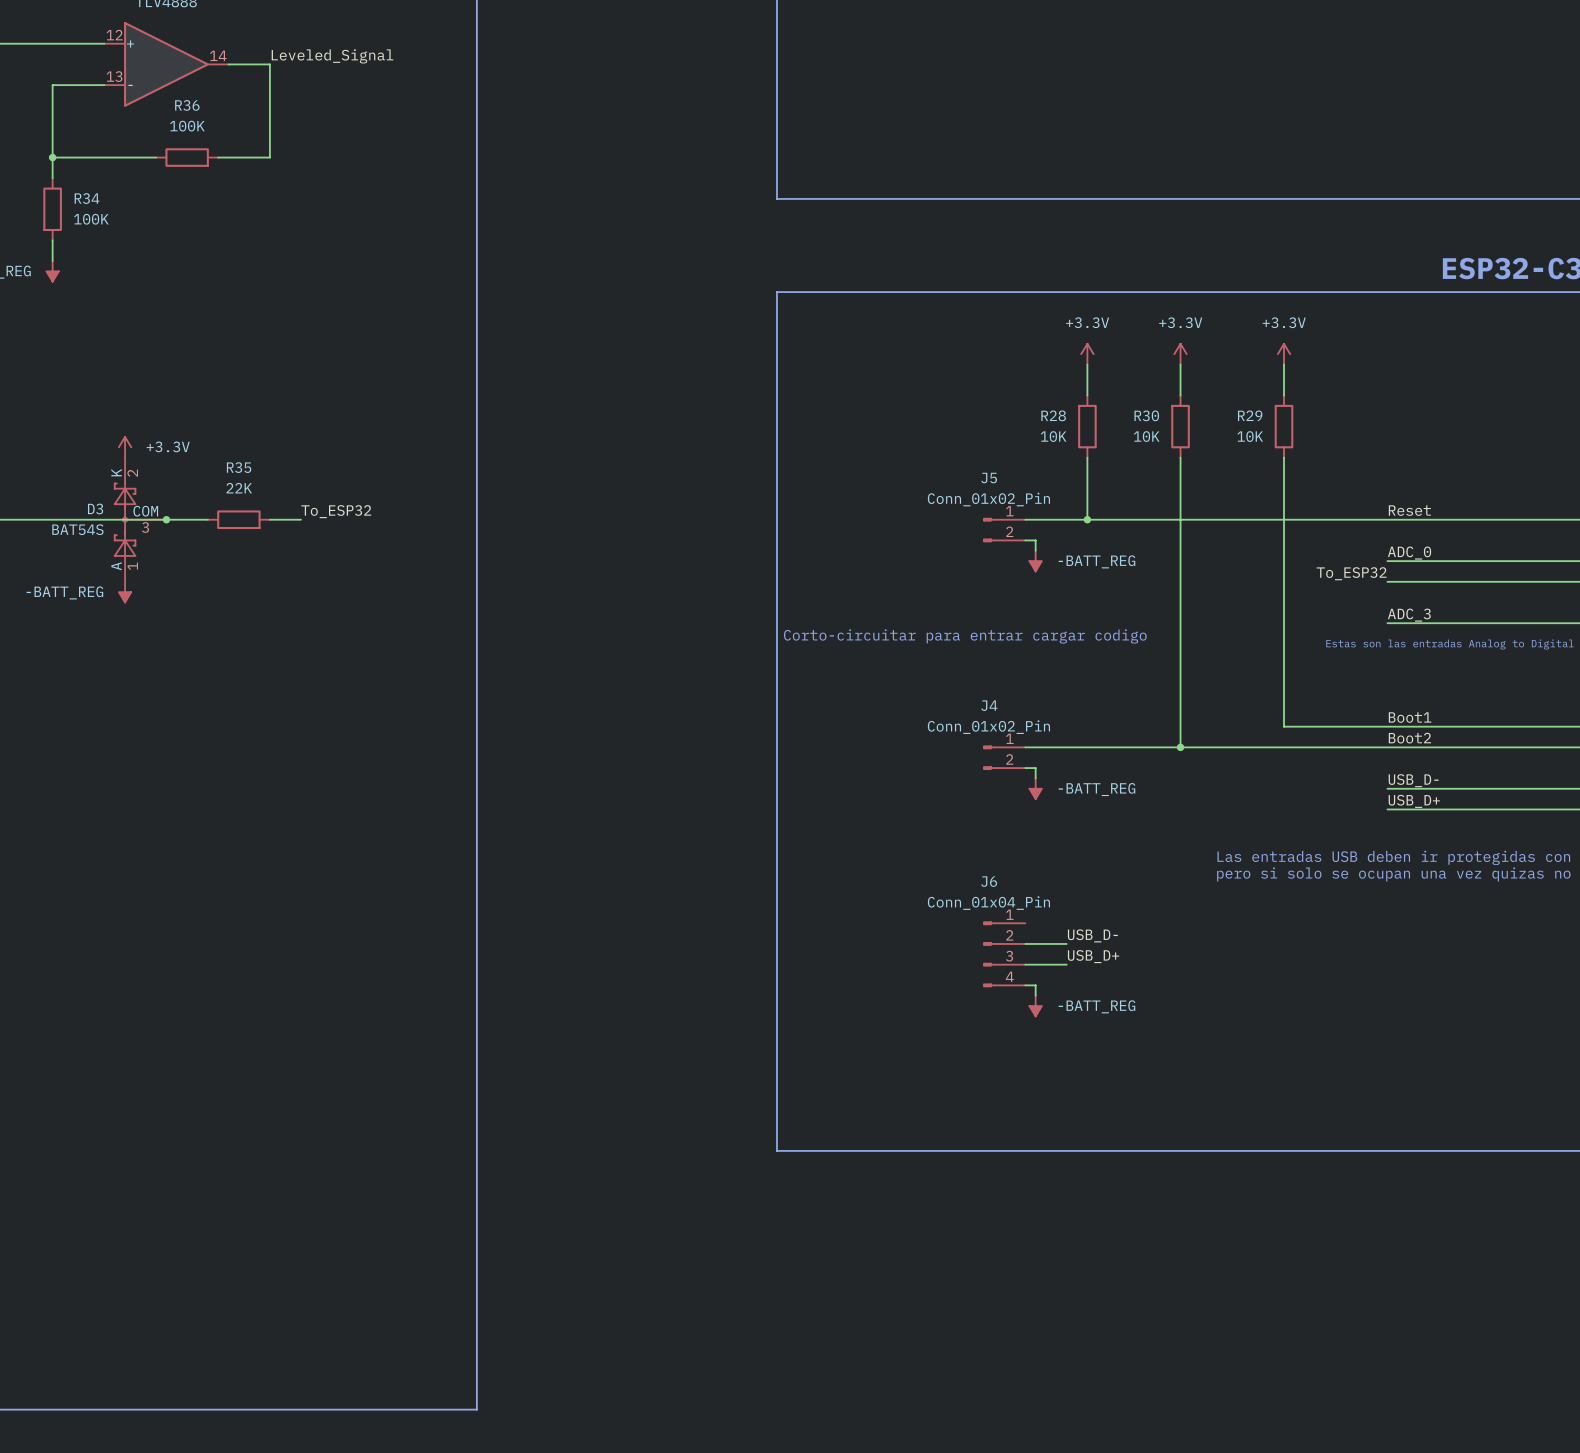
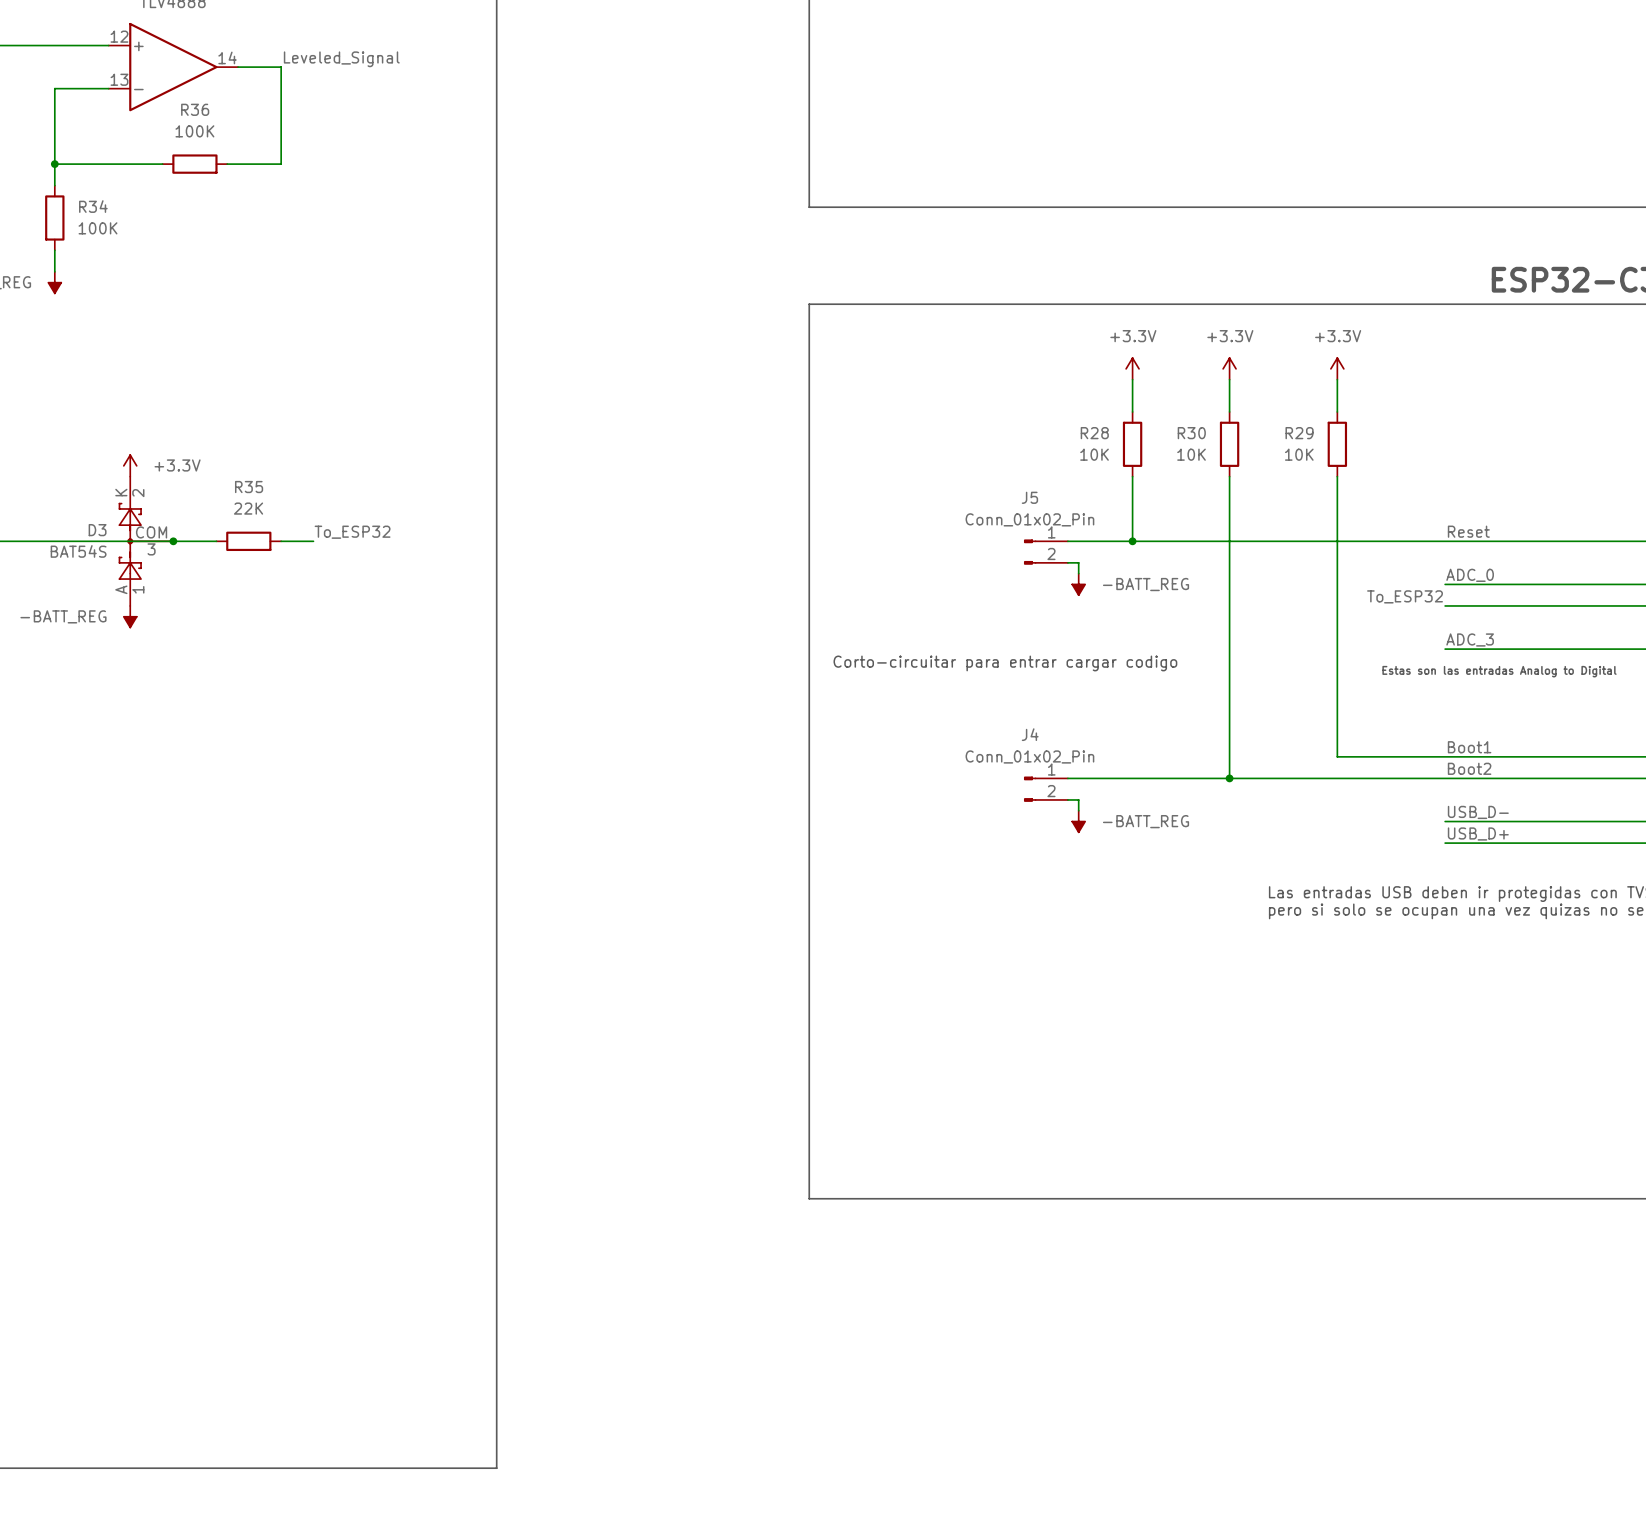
label: USB_D- (1092, 935) -> none
wire: (1025, 943) (1066, 943) -> none
J6: Conn_01x04_Pin (1004, 954) -> none
label: USB_D+ (1093, 956) -> none
wire: (1025, 964) (1066, 964) -> none
wire: (1025, 985) (1035, 985) (1035, 995) -> none
power symbol: -BATT_REG (1035, 1006) -> none

